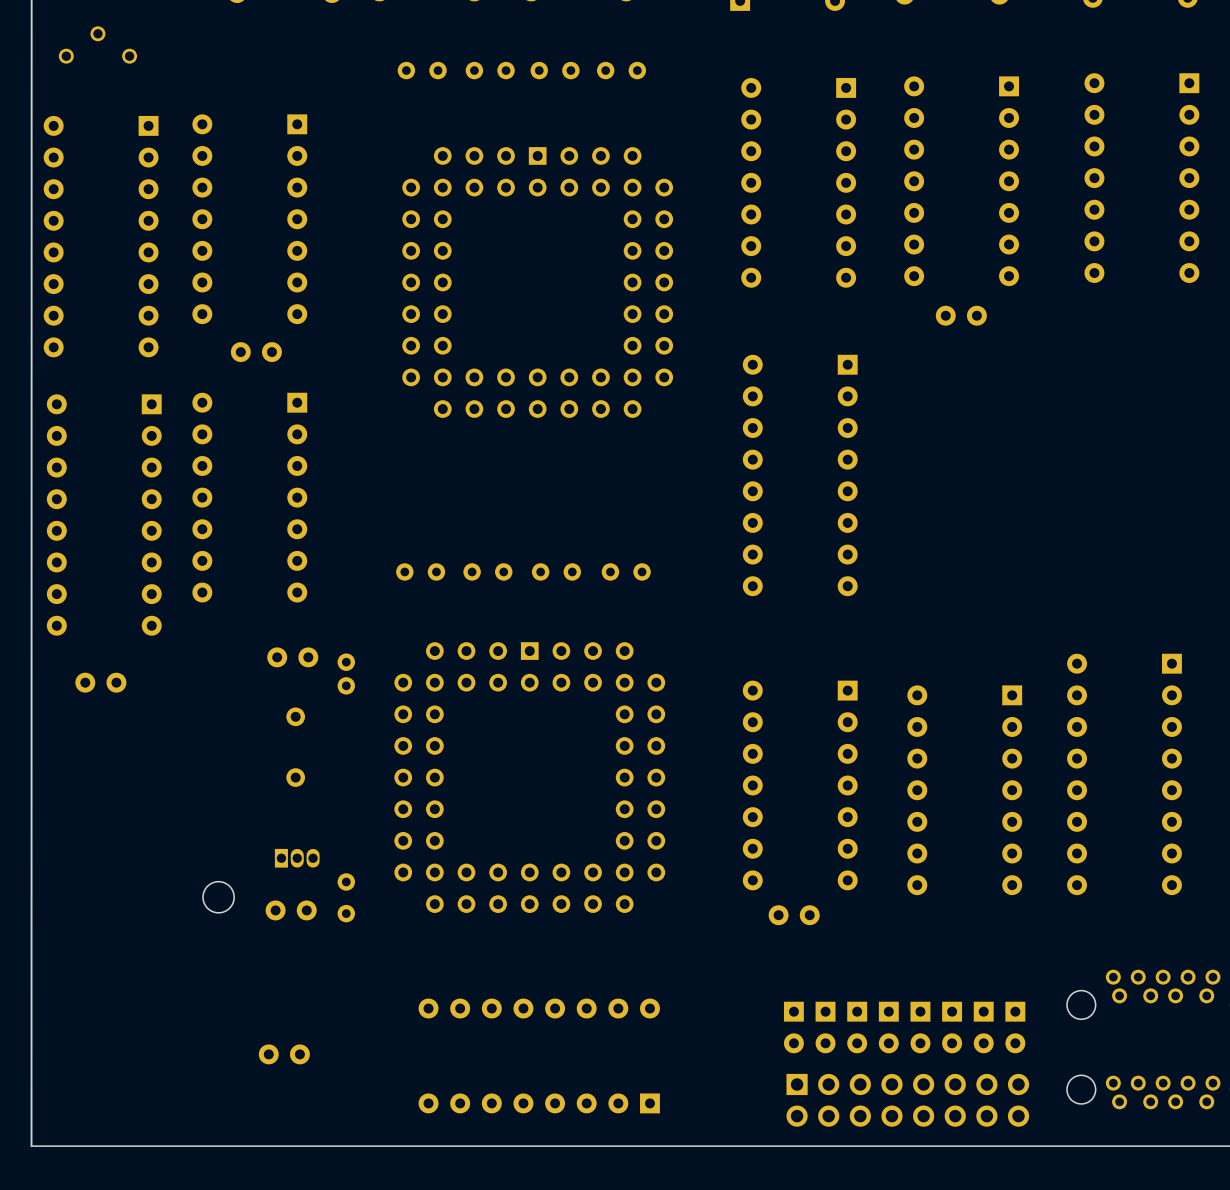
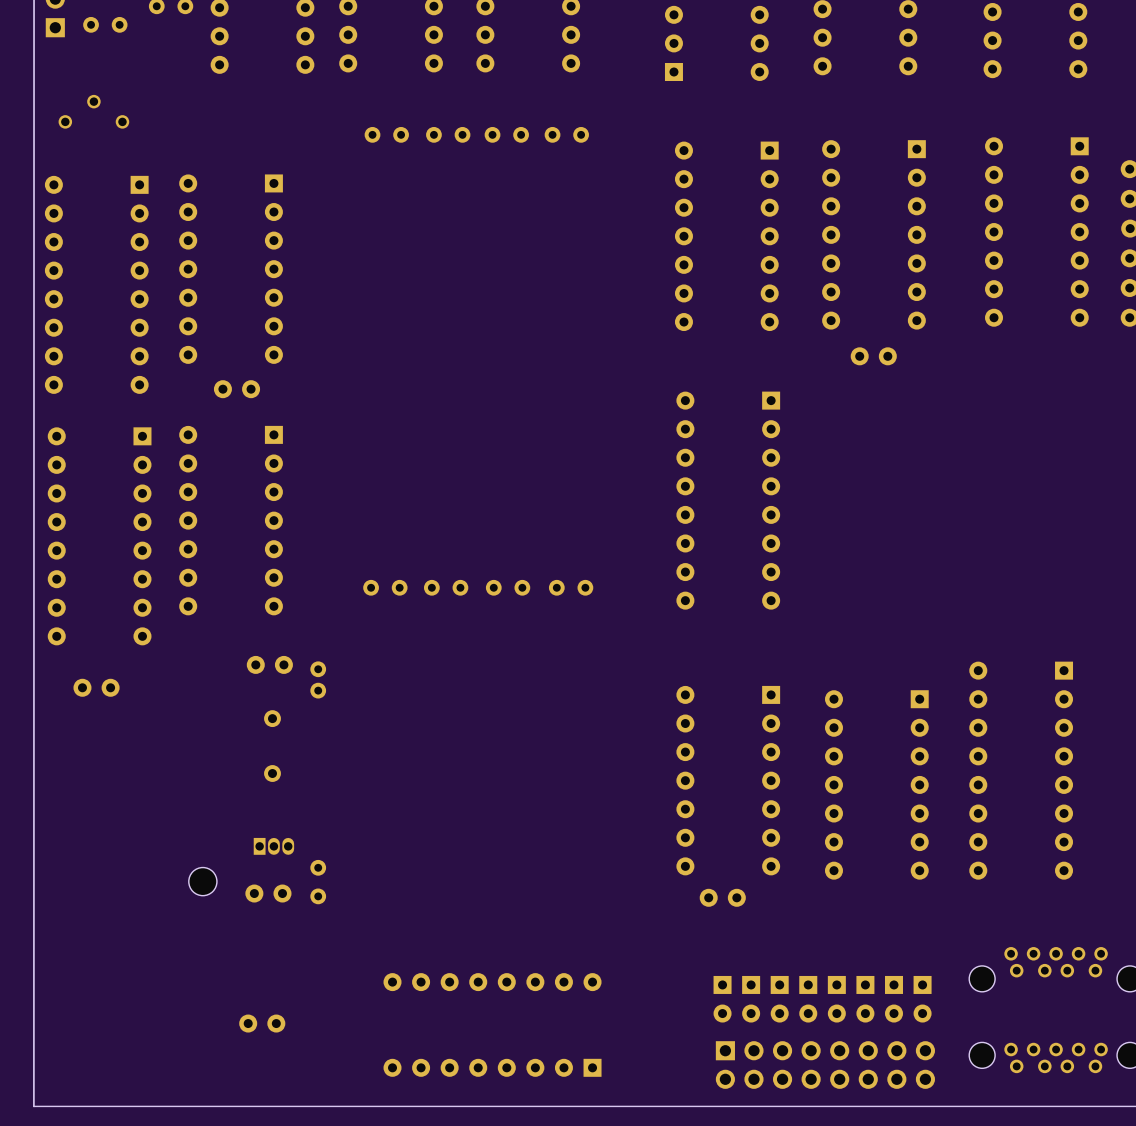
part: (537, 282) -> none
part: (529, 777) -> none

